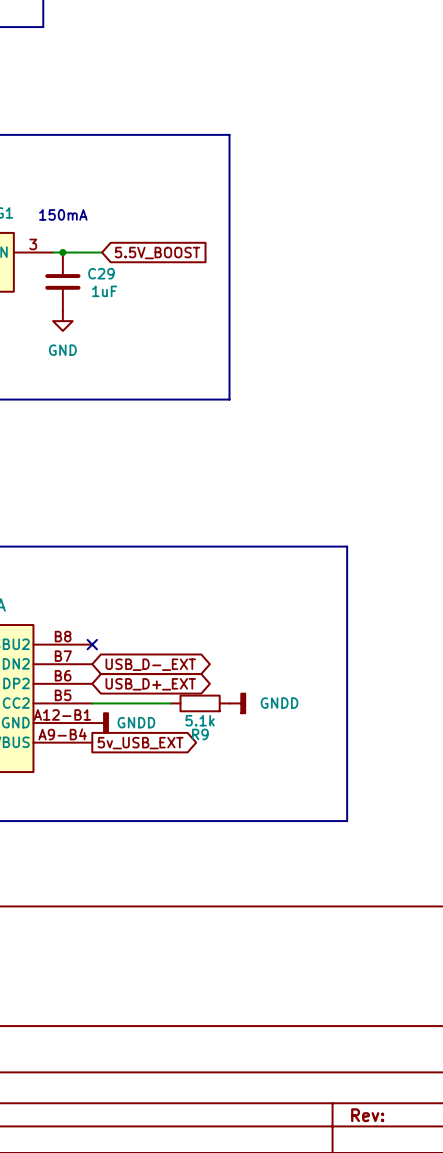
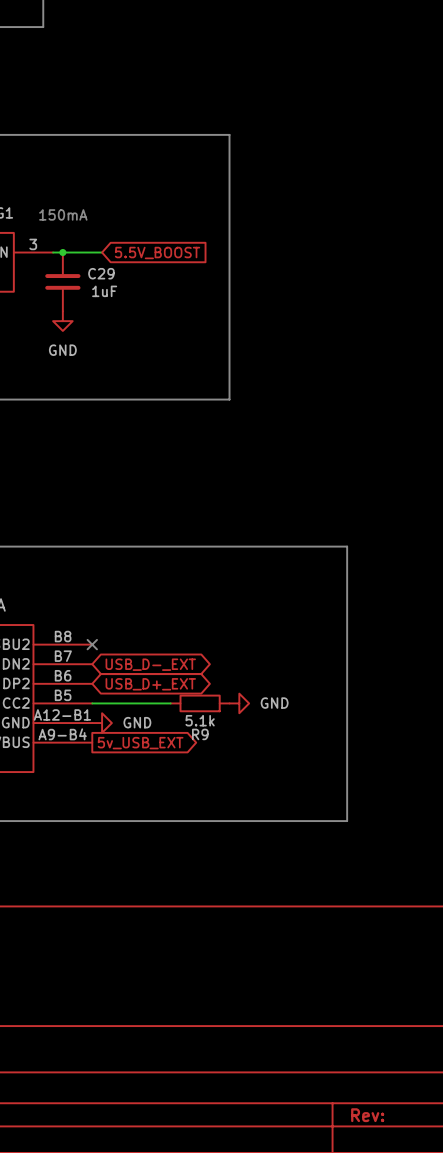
power symbol: GNDD (237, 703) -> GND (239, 703)
power symbol: GNDD (100, 723) -> GND (102, 723)

